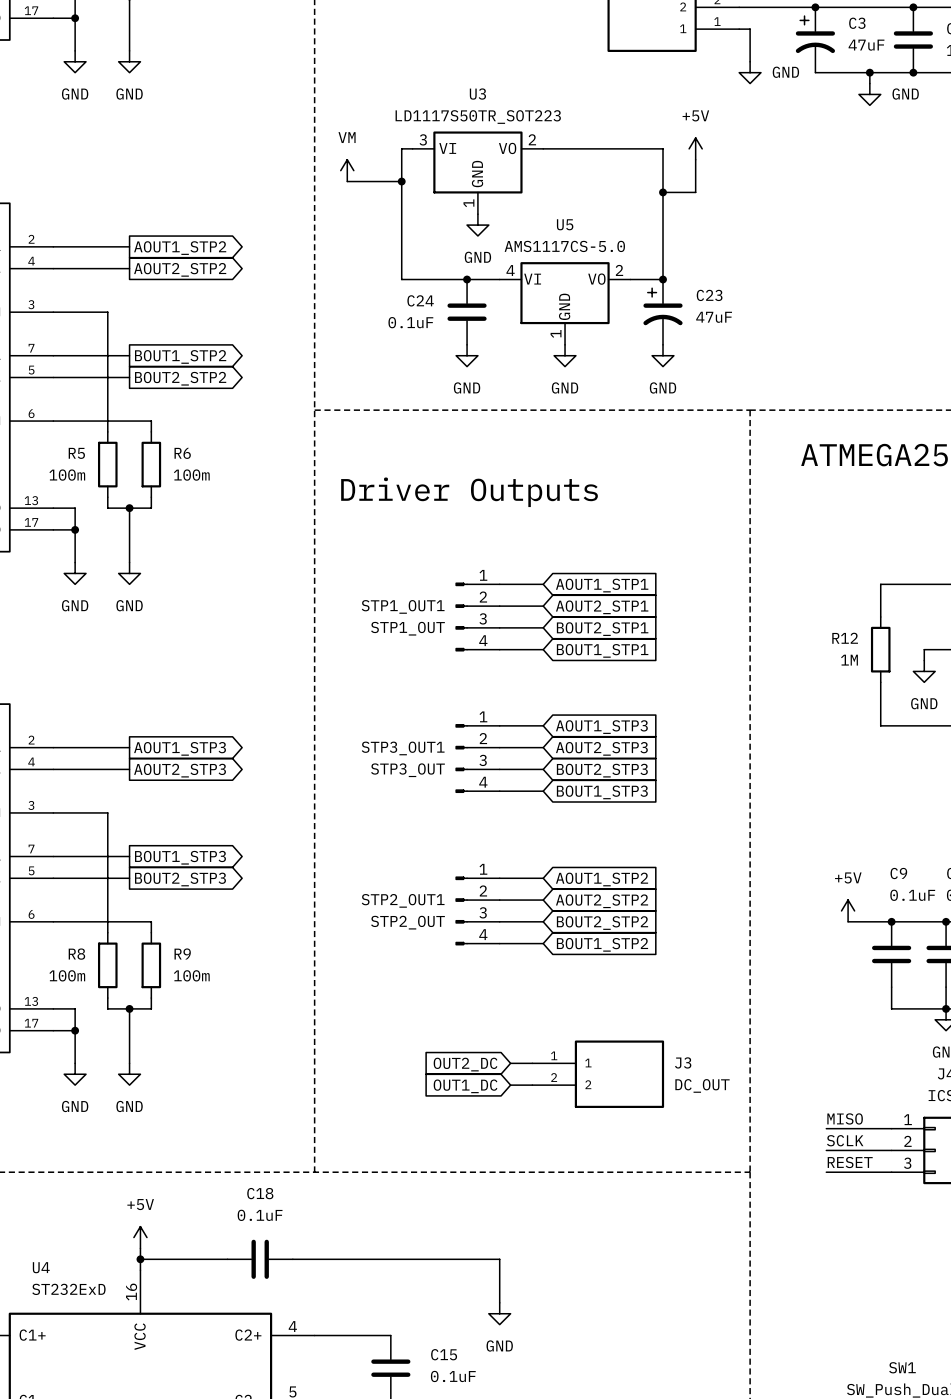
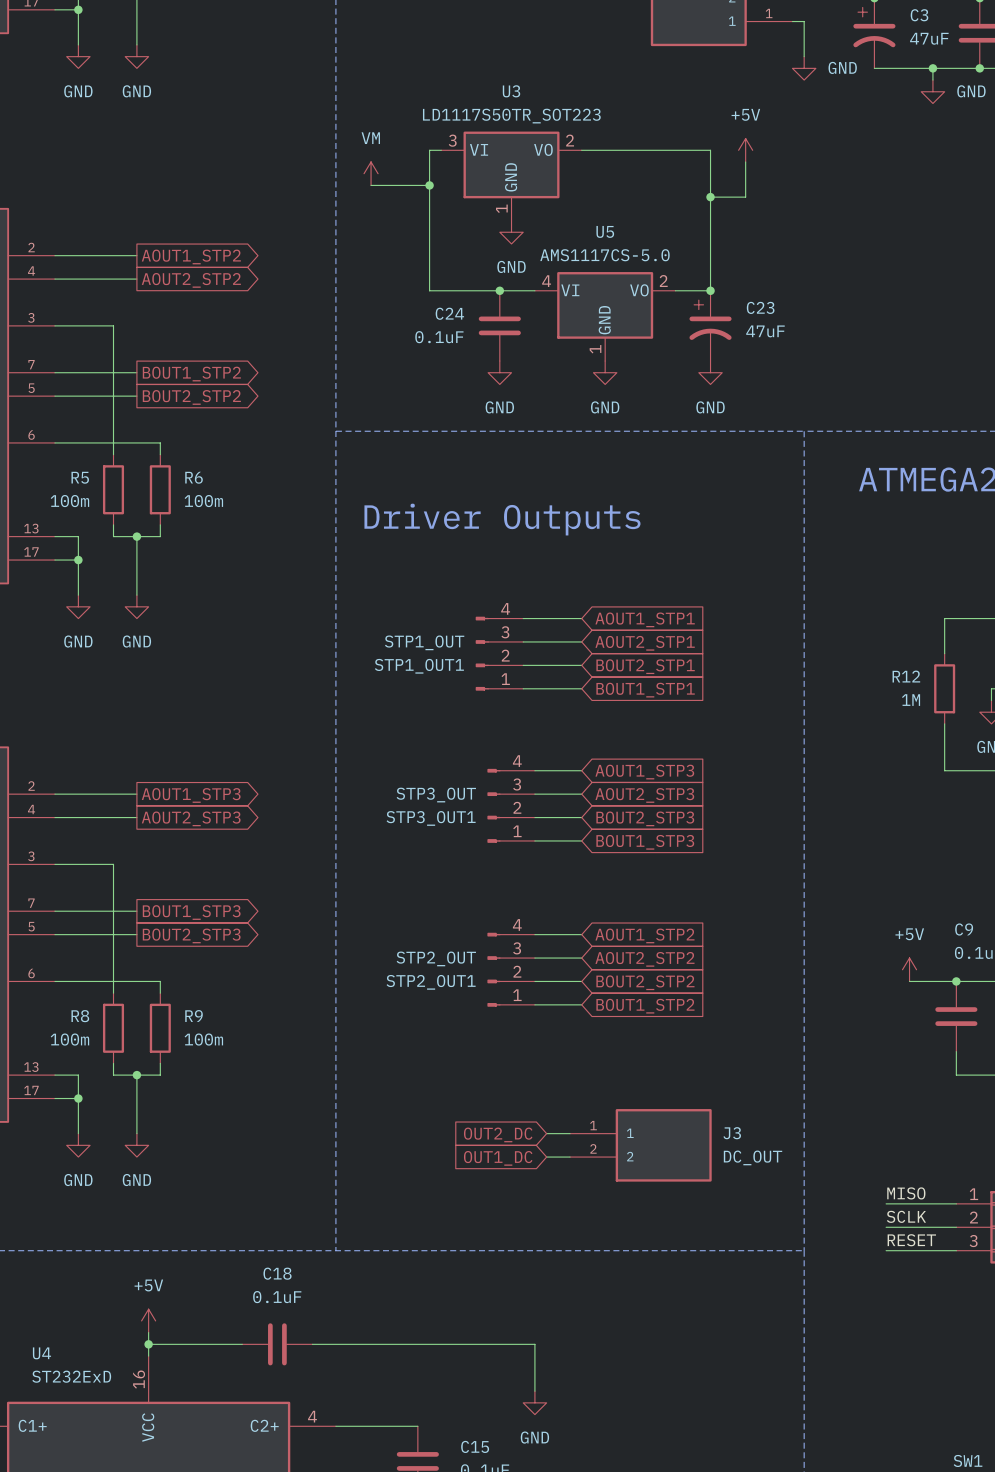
STP1_OUT1 flip: as is (461, 617) -> up-down (482, 653)
STP3_OUT1 flip: as is (461, 758) -> up-down (493, 805)
STP2_OUT1 flip: as is (461, 910) -> up-down (493, 969)

